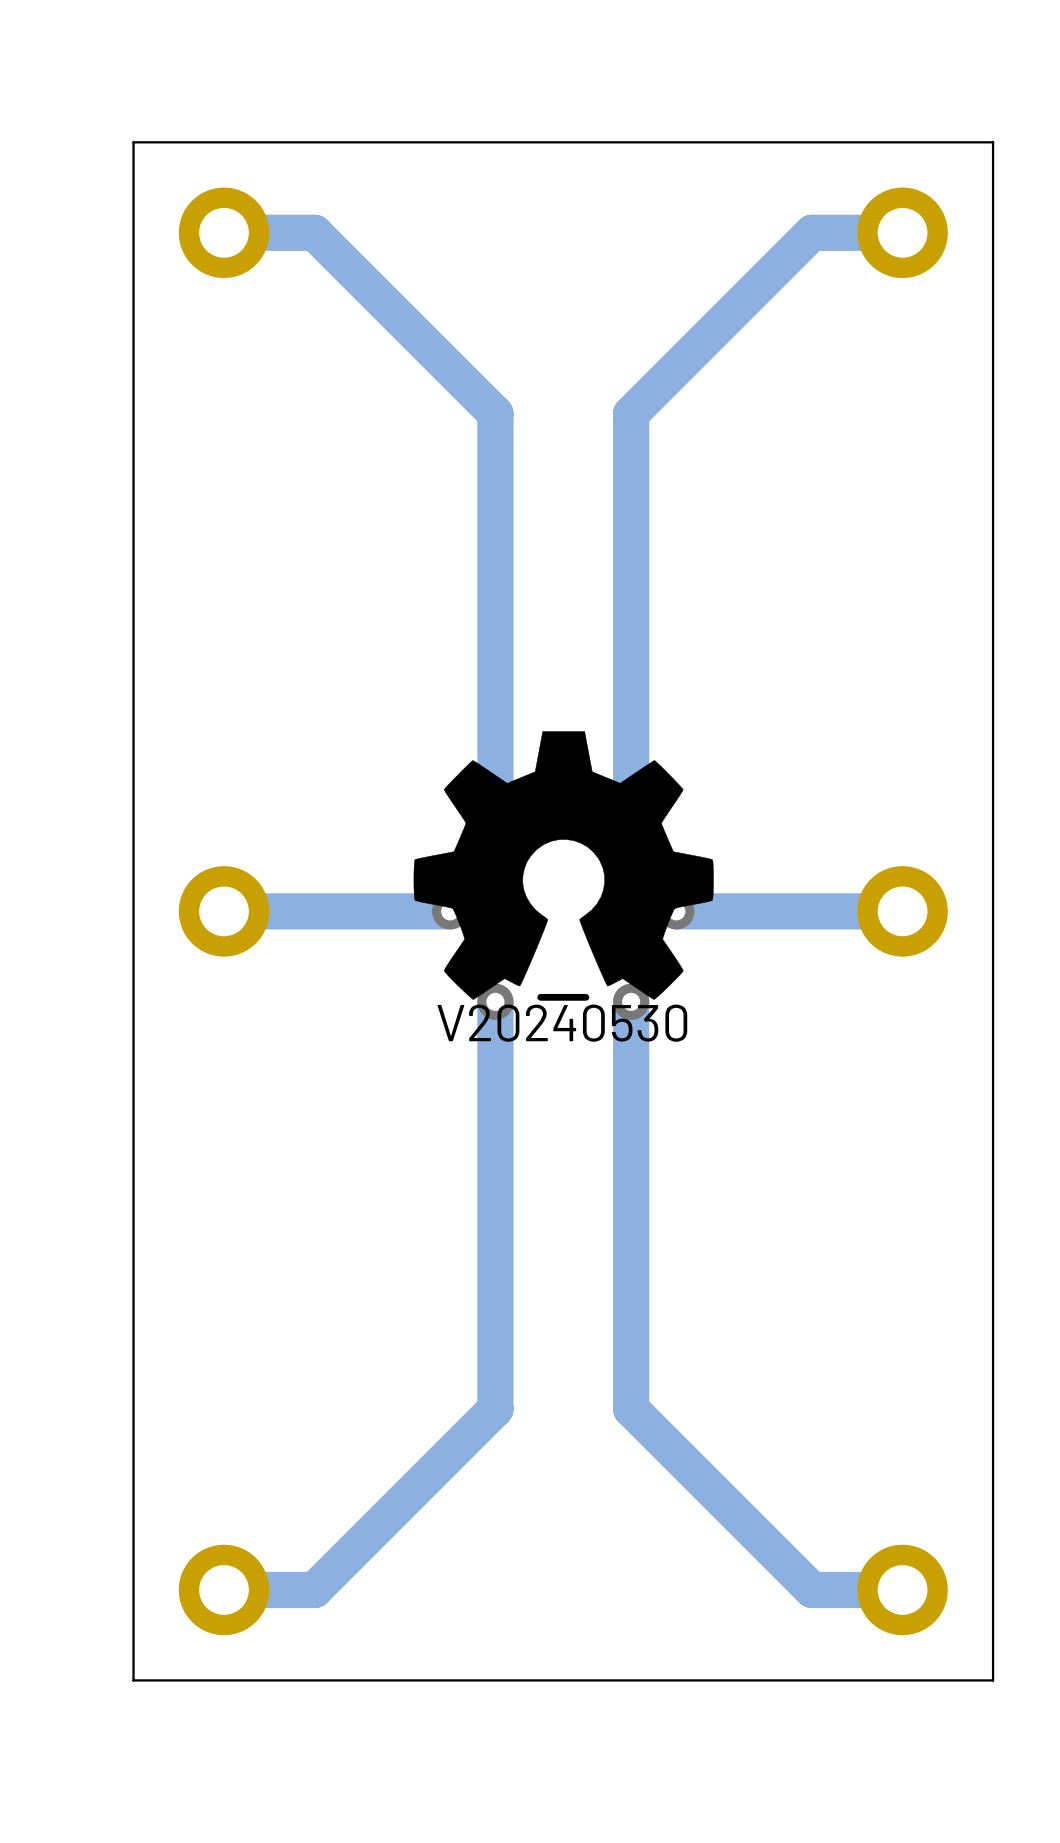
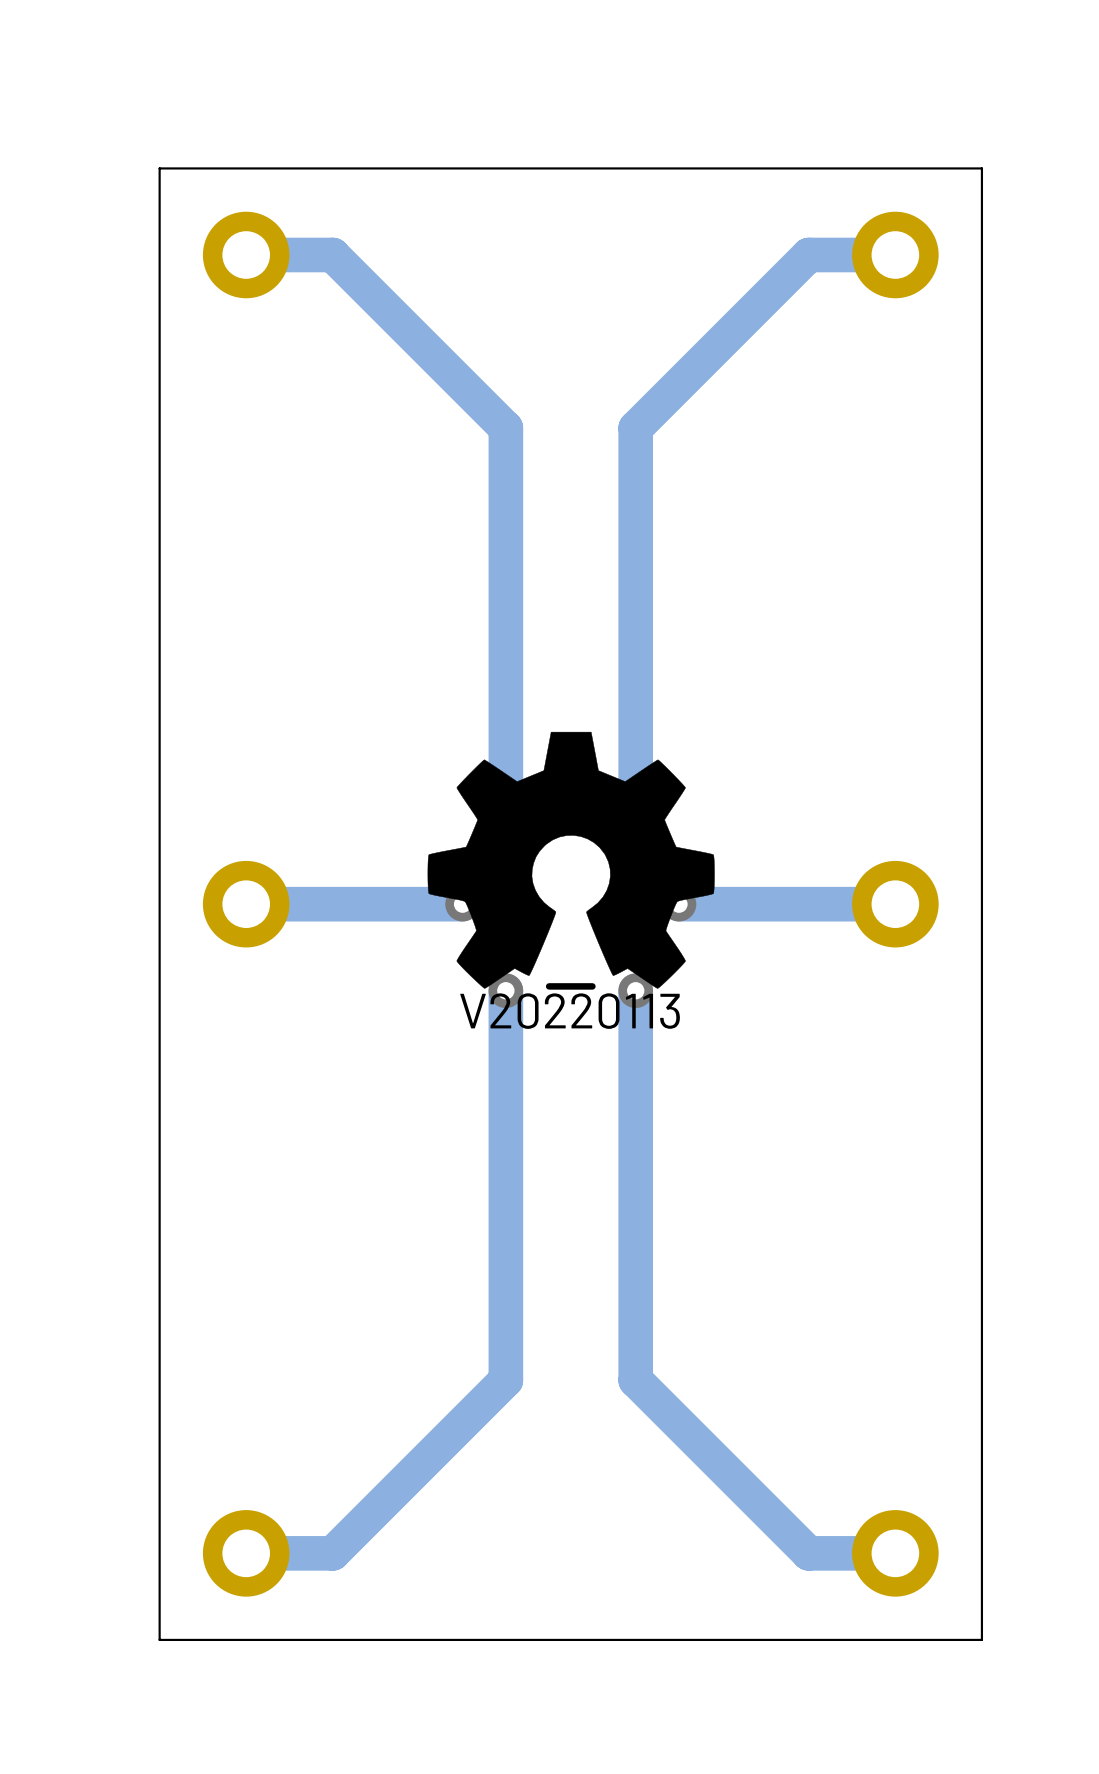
drawing shape: [437, 993, 688, 1042] -> [460, 983, 680, 1029]

